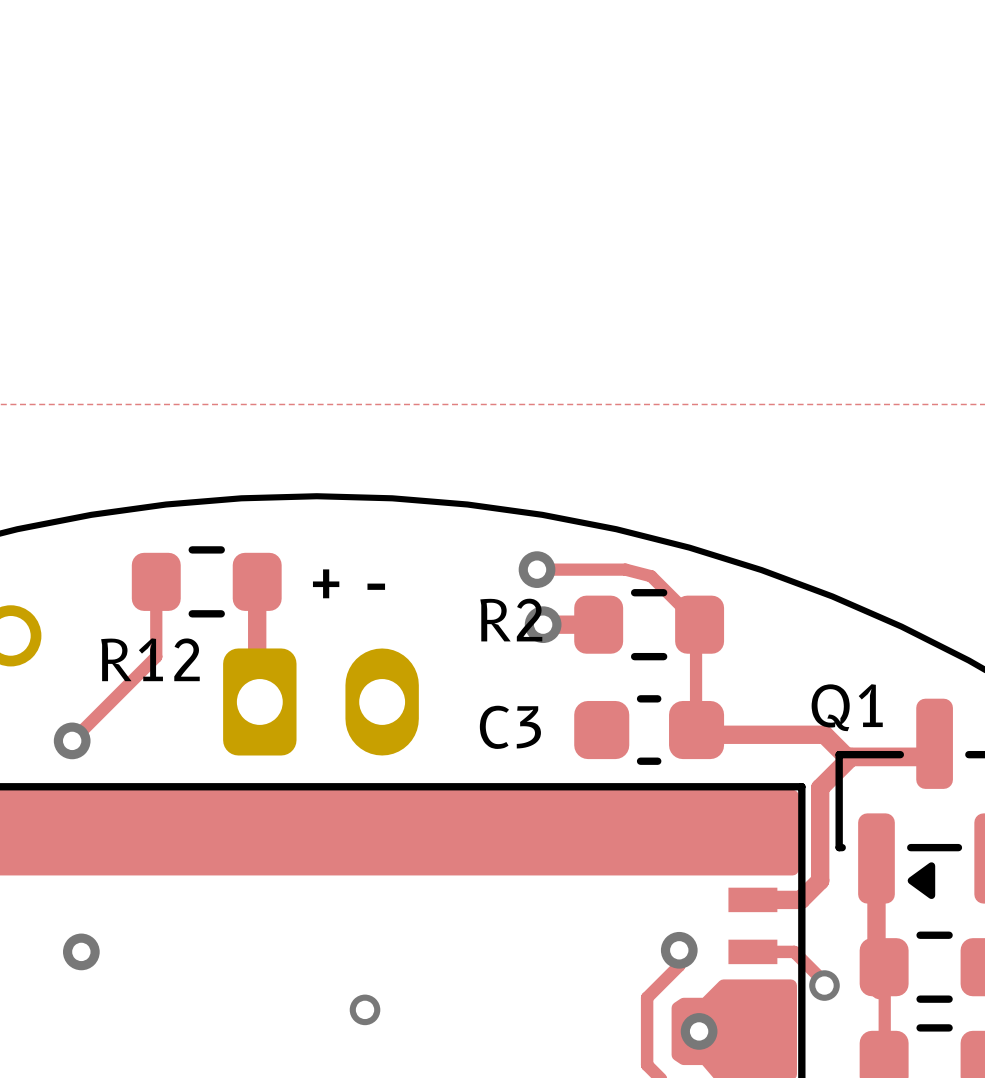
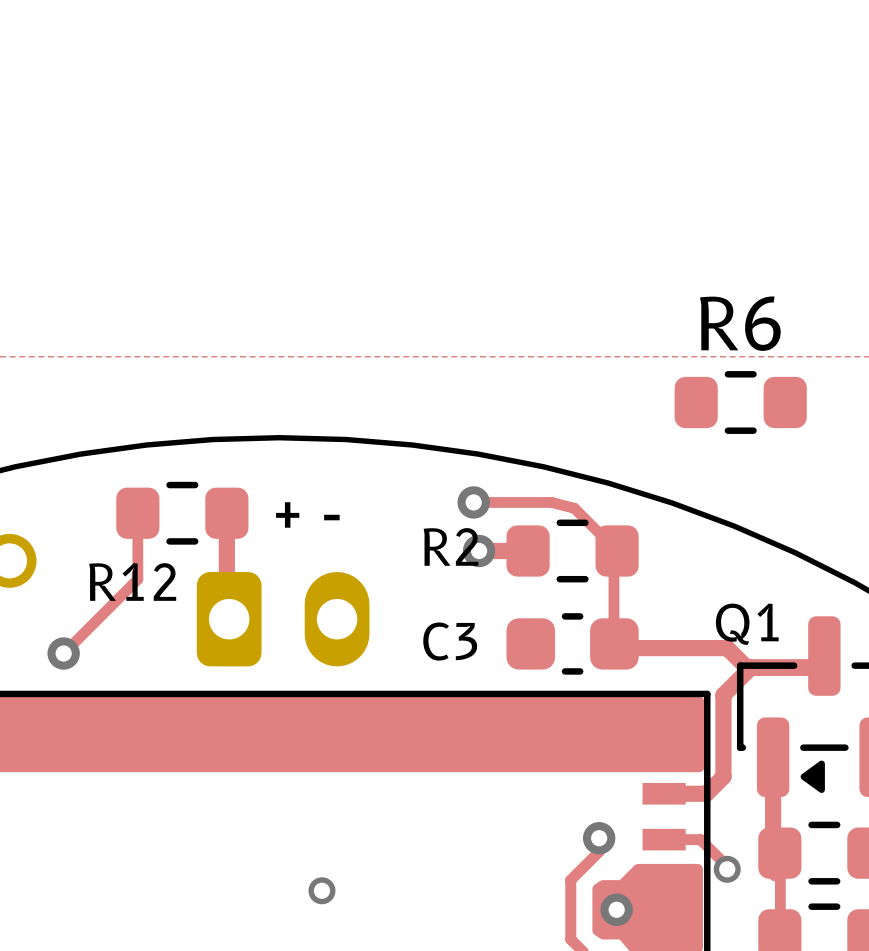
R6: none -> (740, 402)
via: (81, 951) -> none

